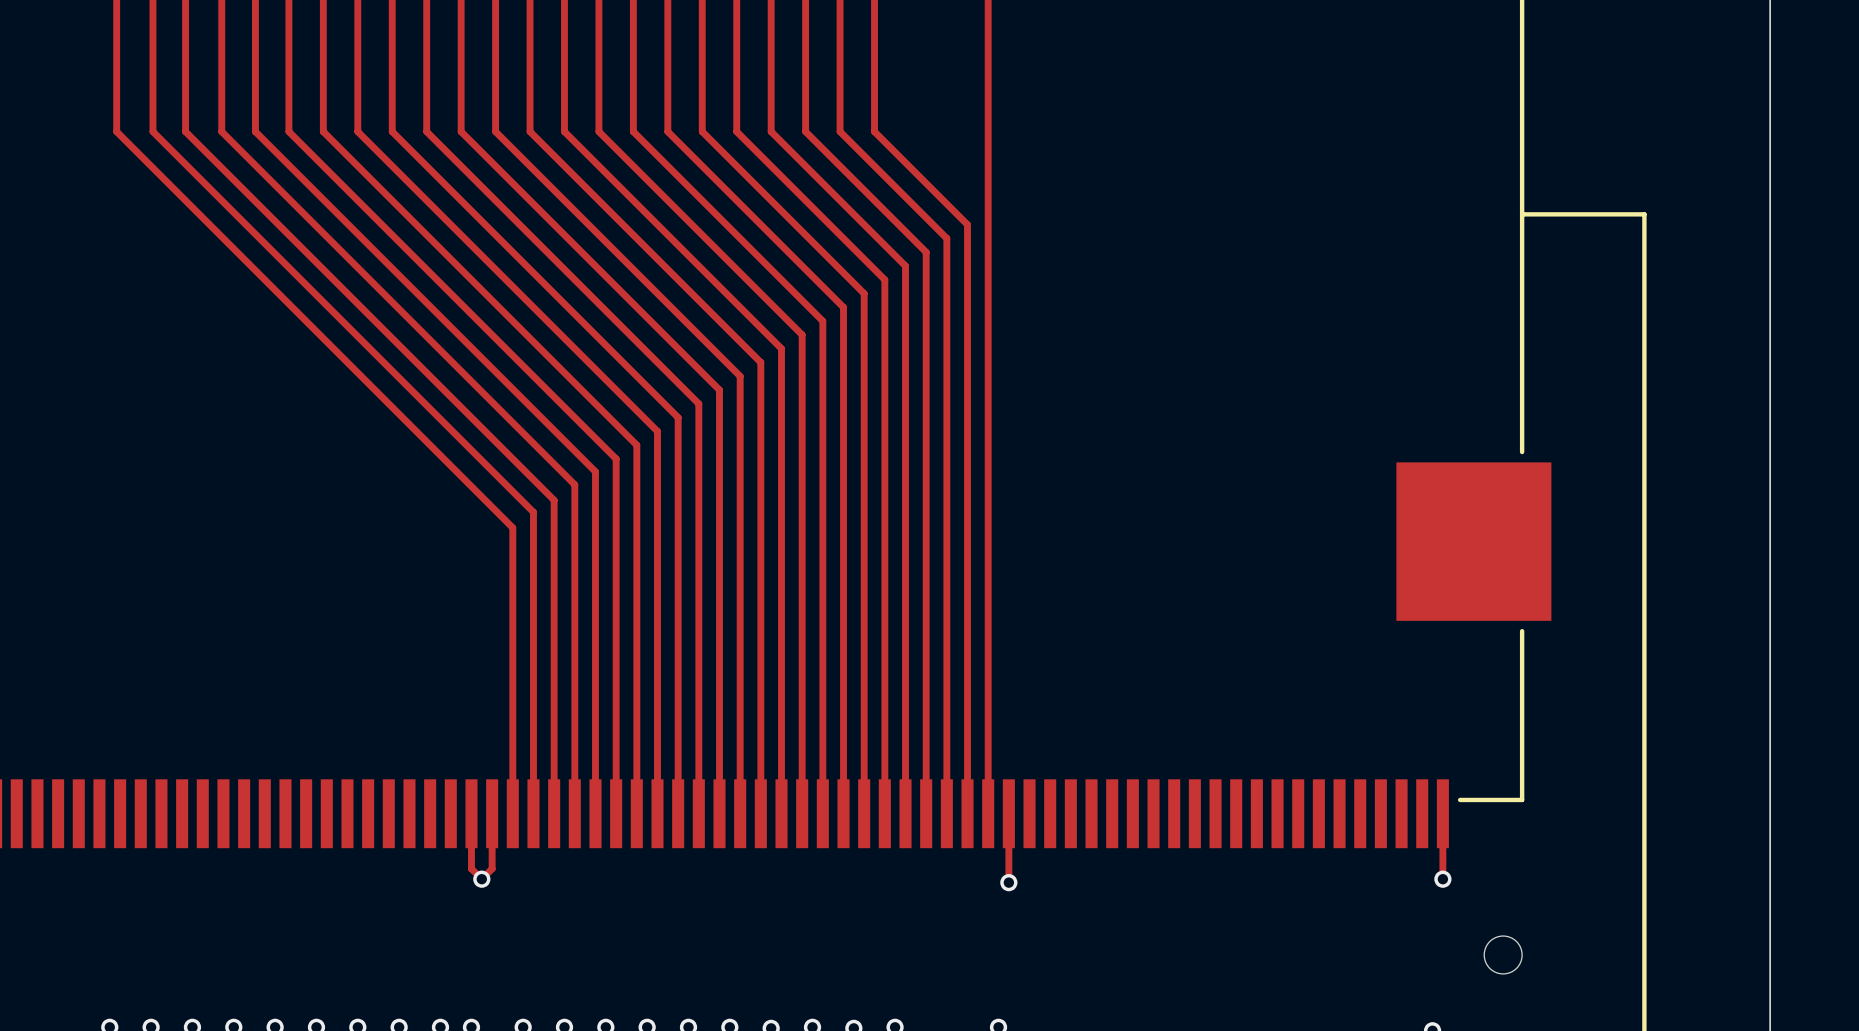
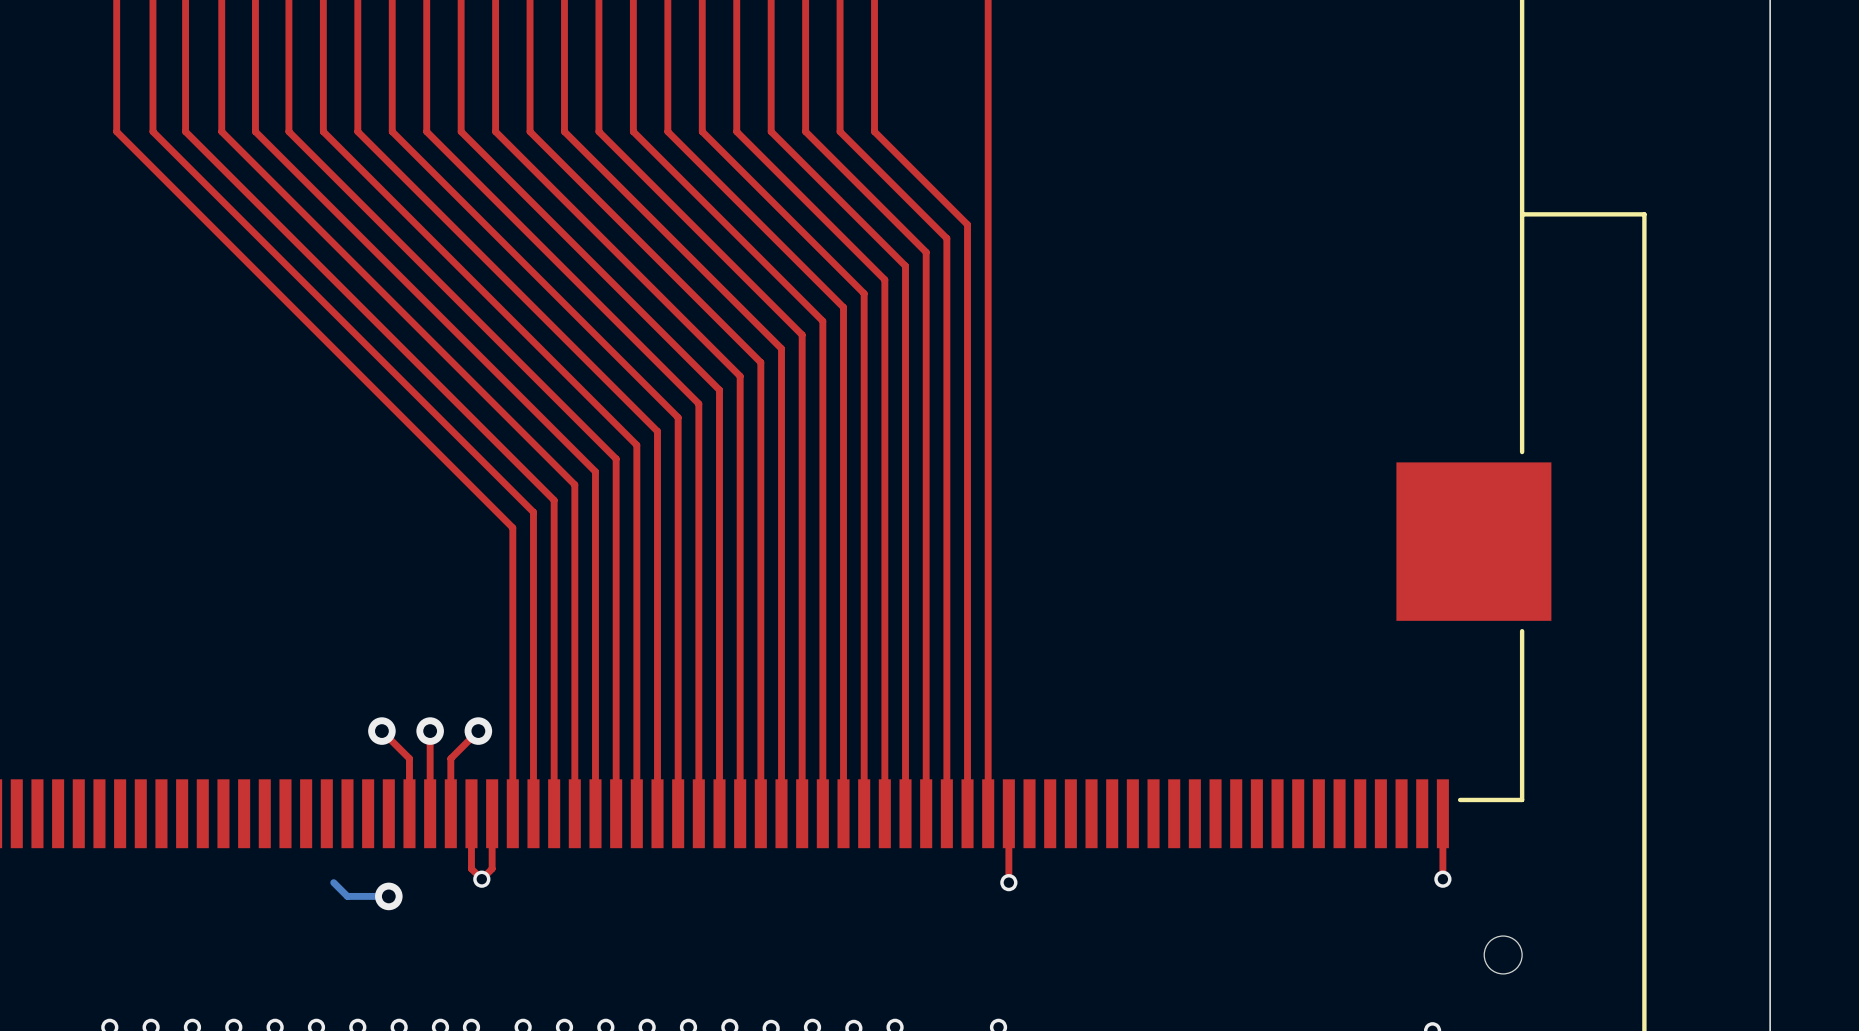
top track: none -> (381, 731) (409, 758) (409, 813)
via: none -> (381, 731)
top track: none -> (430, 731) (430, 813)
via: none -> (430, 731)
top track: none -> (478, 731) (450, 758) (450, 813)
via: none -> (478, 731)
bottom track: none -> (333, 882) (347, 896) (388, 896)
via: none -> (388, 896)

